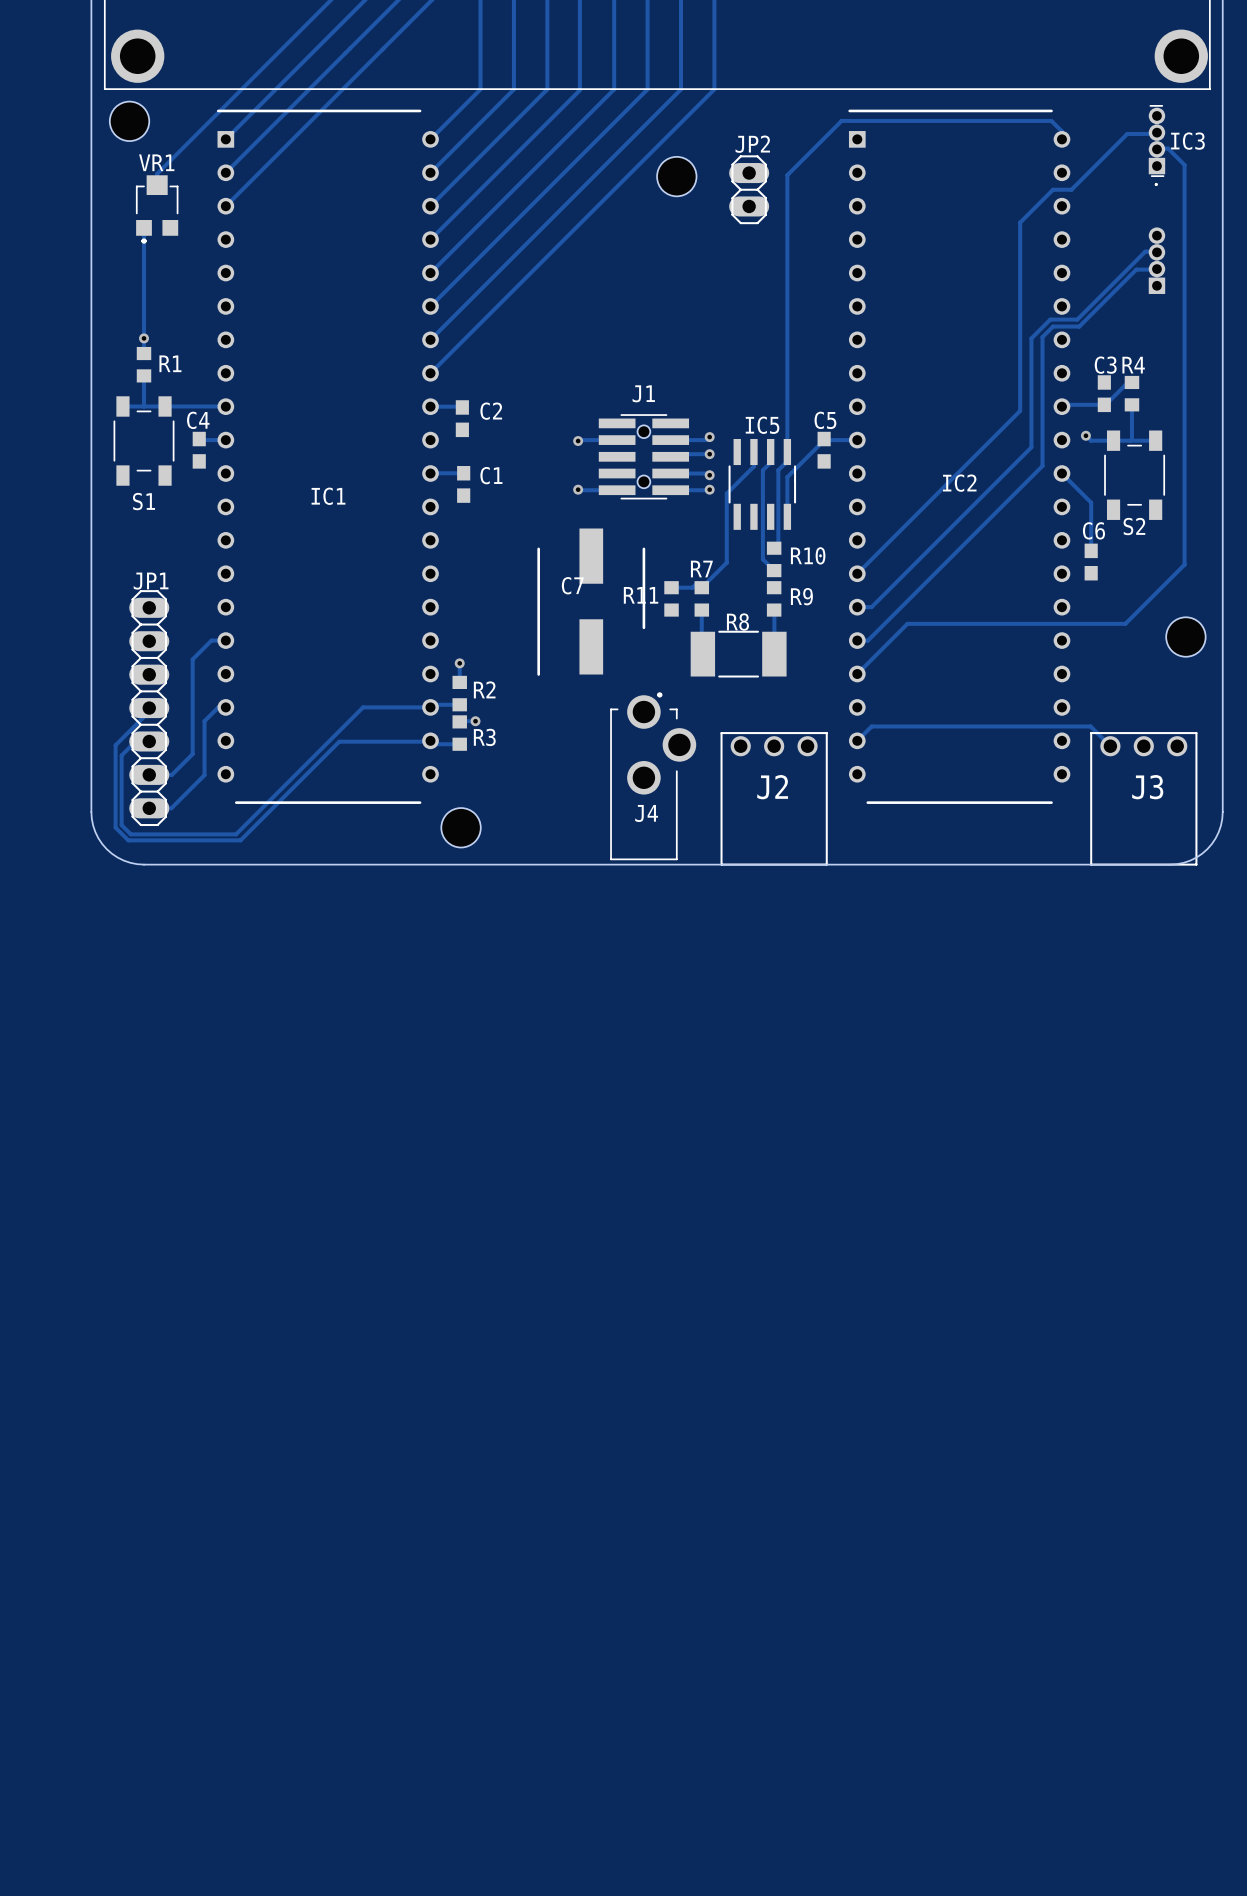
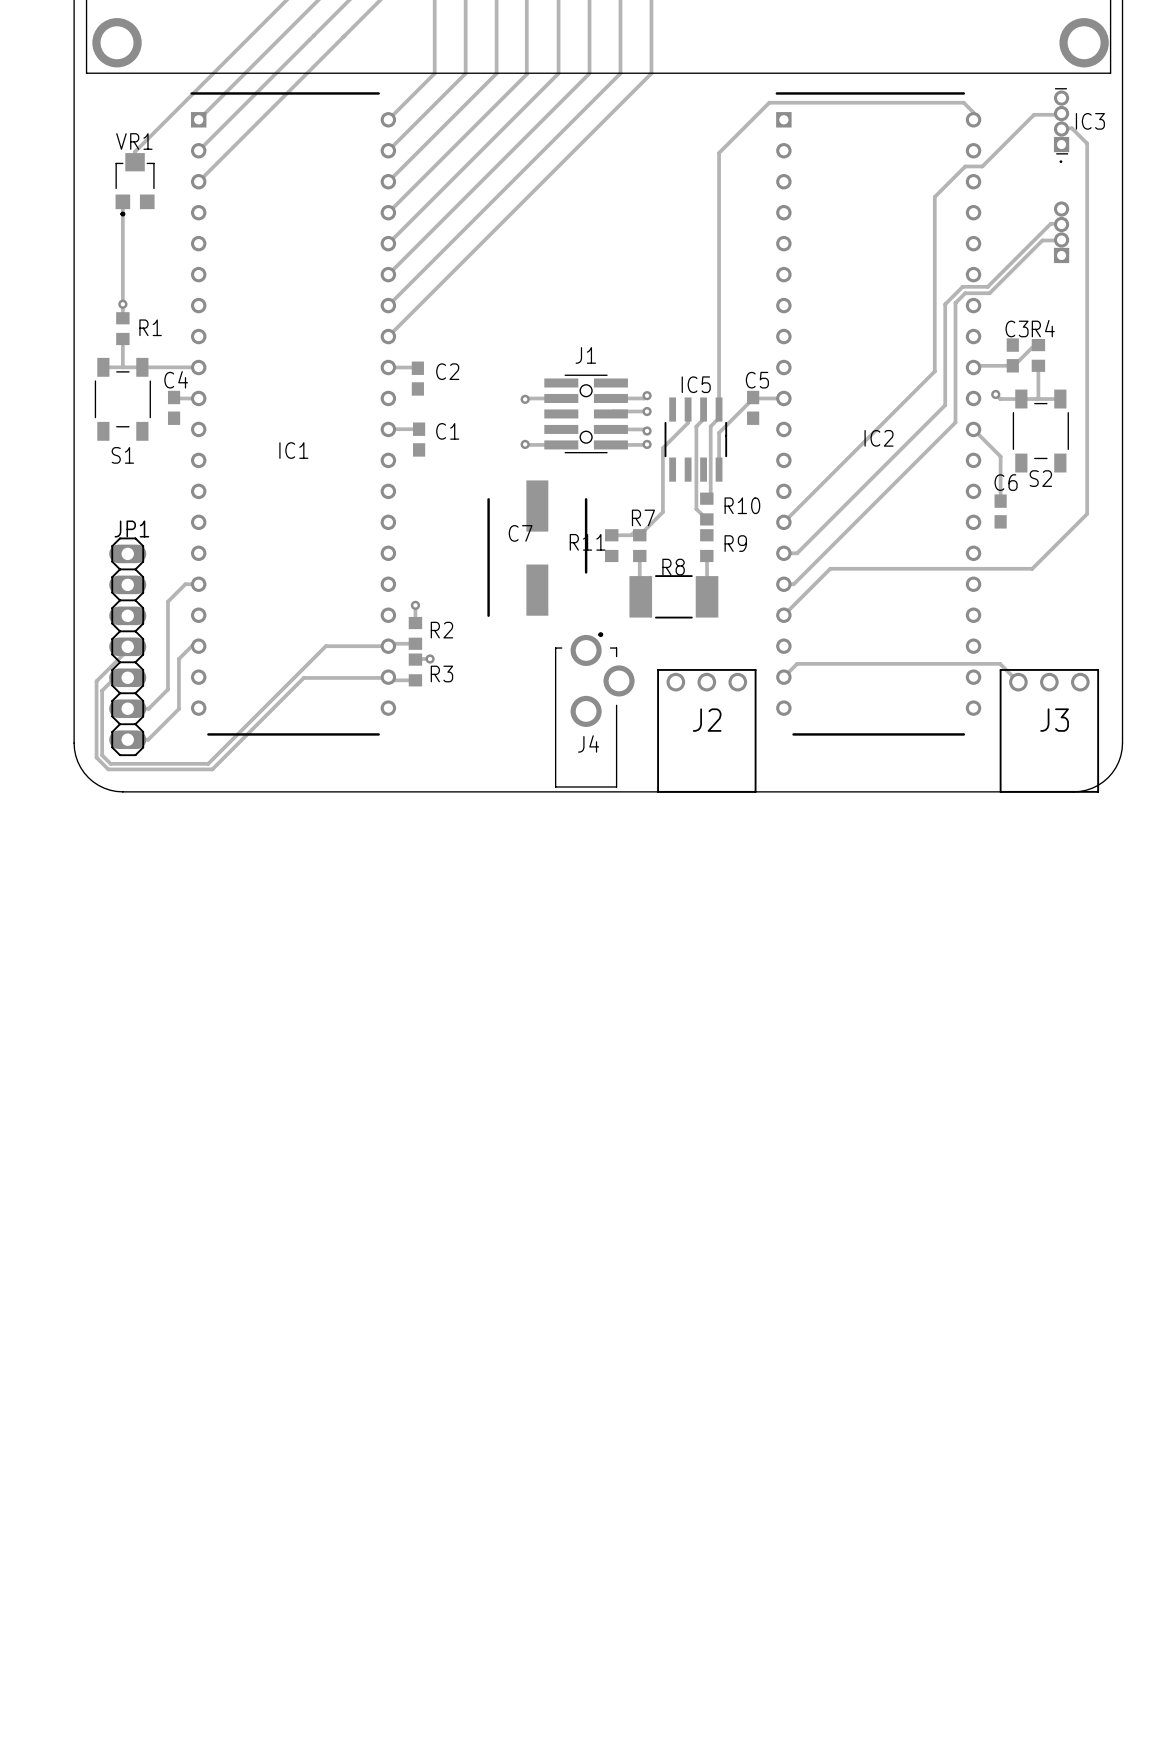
hole: (129, 121) -> none
hole: (676, 176) -> none
JP2: (749, 189) -> none
hole: (1185, 637) -> none
hole: (461, 827) -> none

